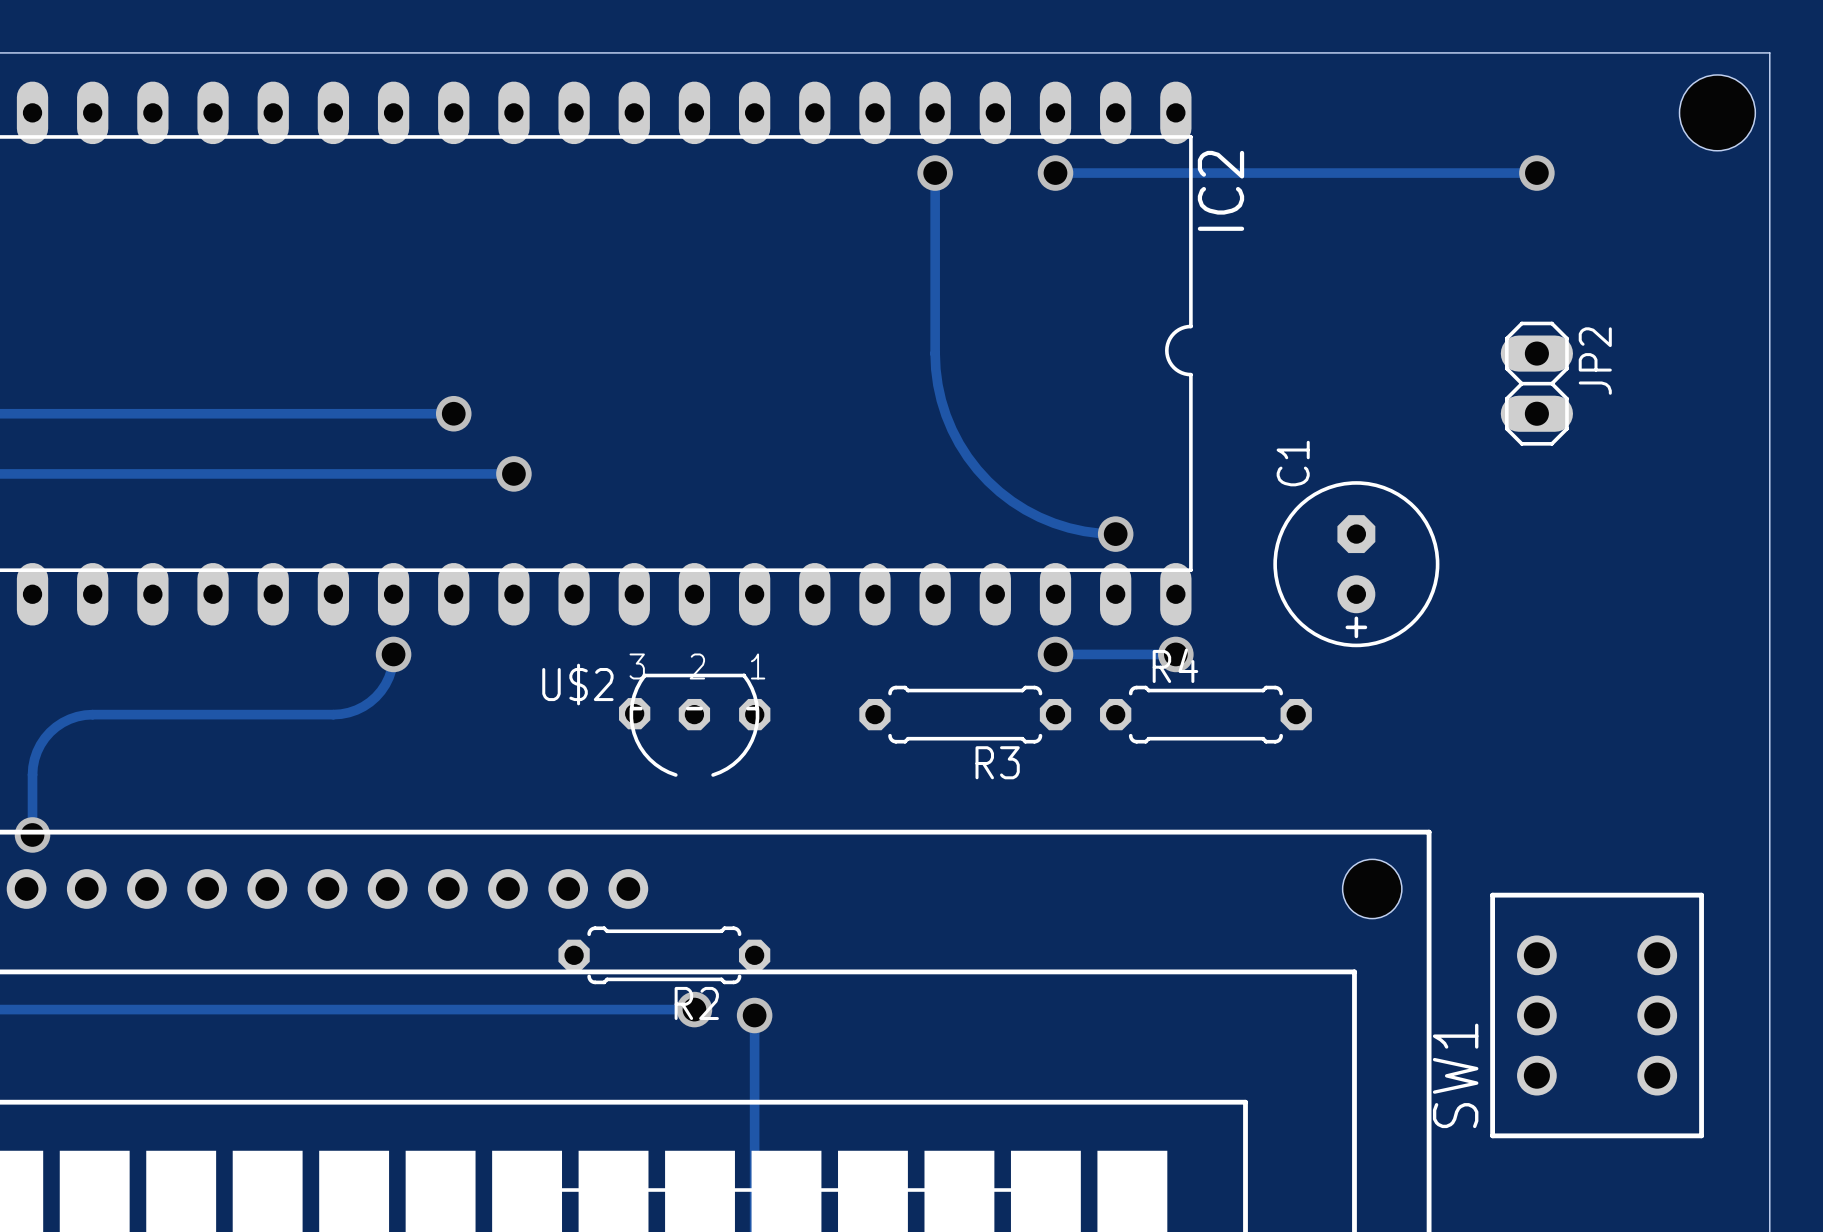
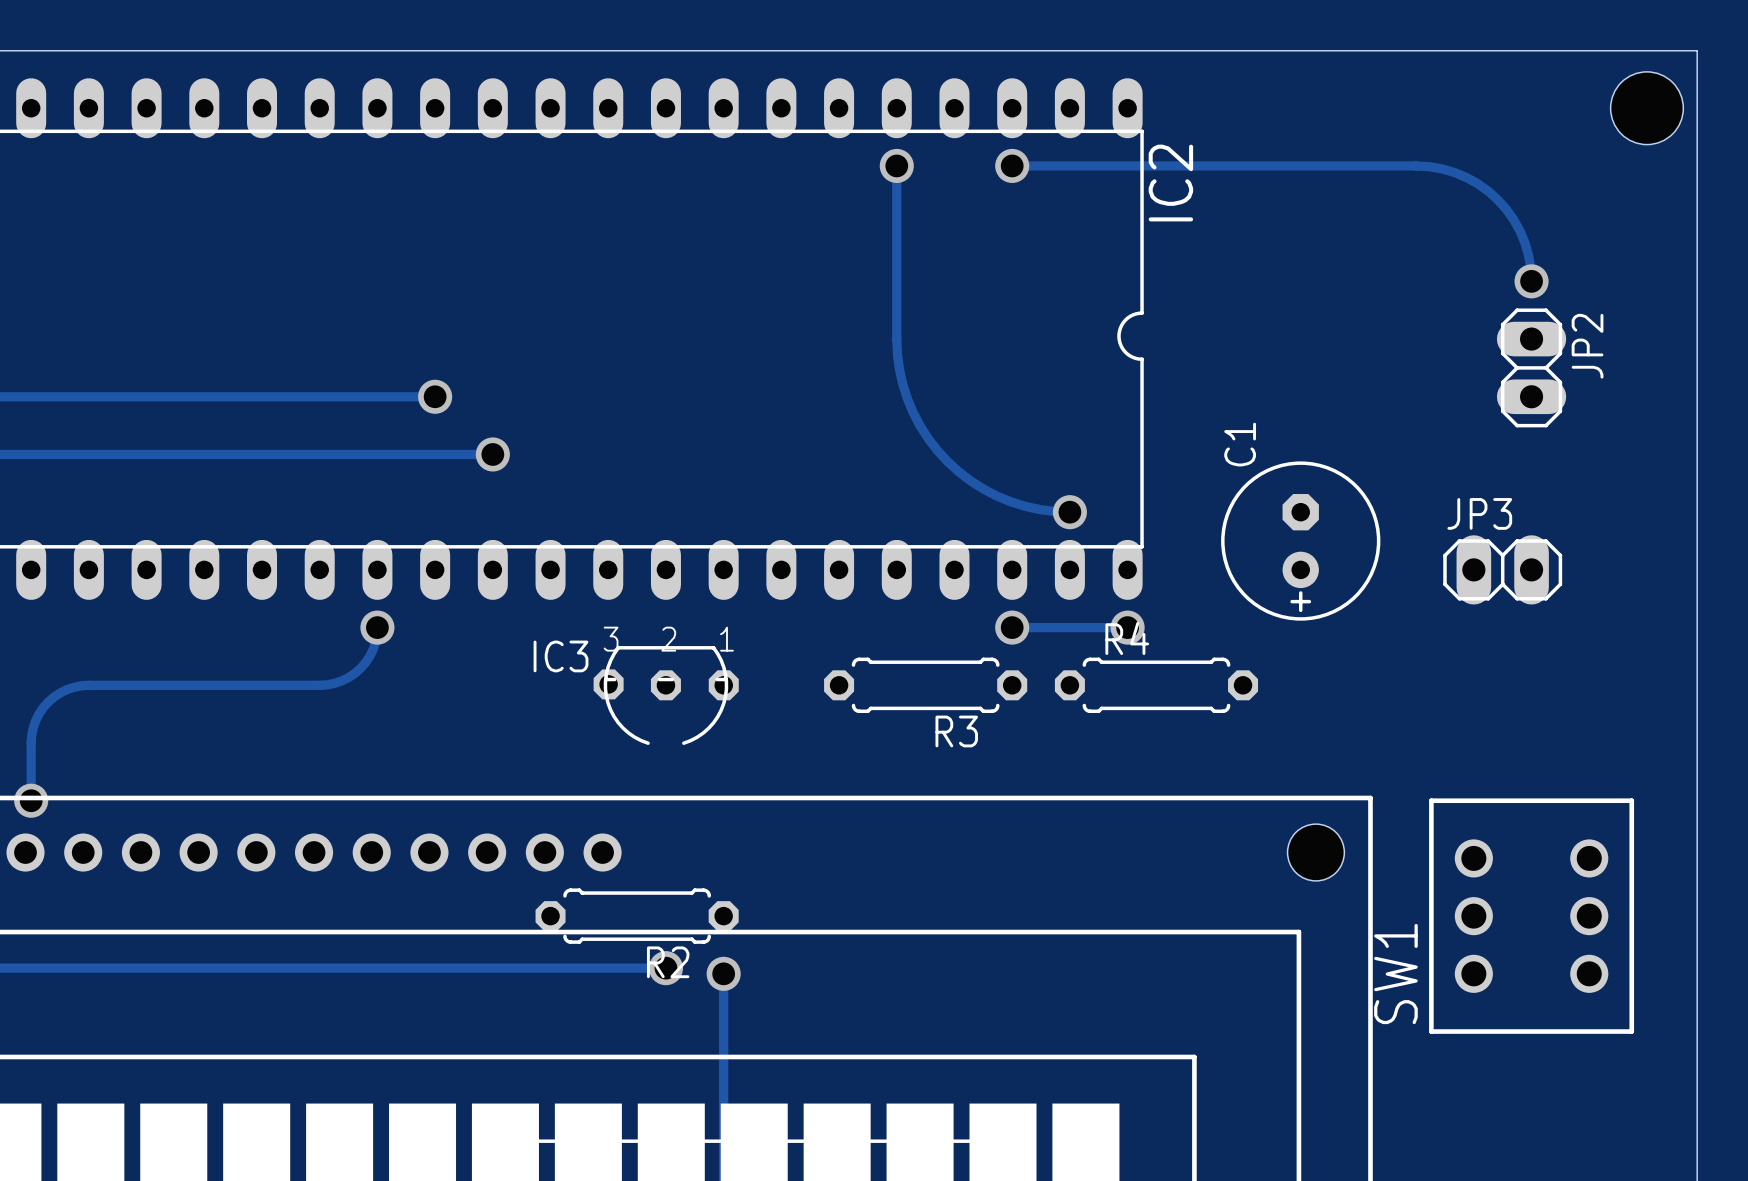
track: (1476, 173) (1536, 173) -> (1416, 165) (1441, 168) (1466, 177) (1497, 199) (1520, 231) (1528, 255) (1531, 281)
via position: (1536, 173) -> (1531, 281)
JP2 position: (1536, 383) -> (1531, 367)
JP3: none -> (1502, 569)
U$2 name: U$2 (577, 684) -> IC3 (561, 656)
SW1 position: (1597, 1015) -> (1531, 916)

